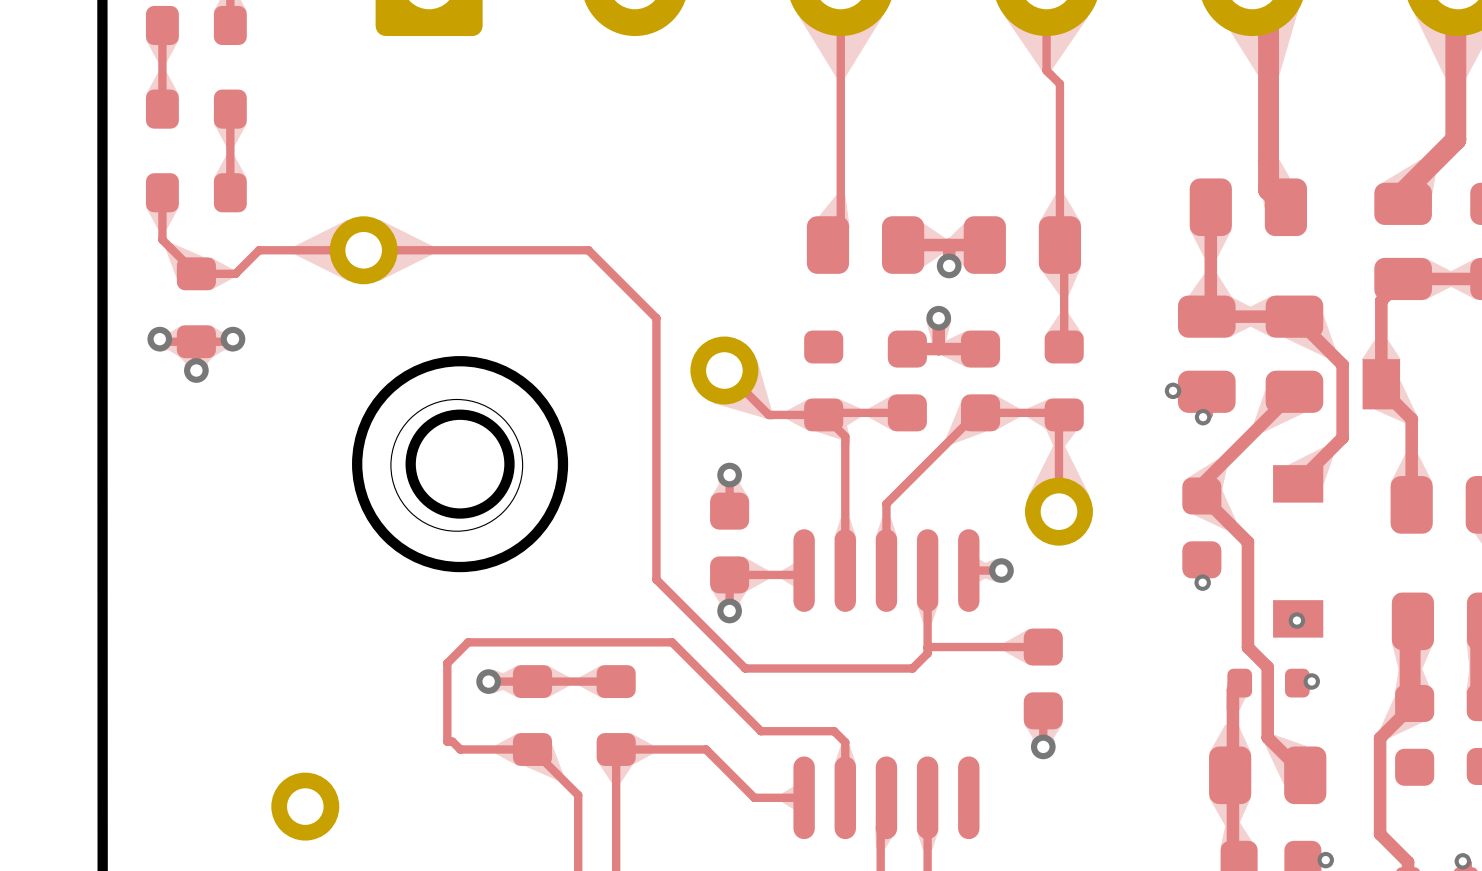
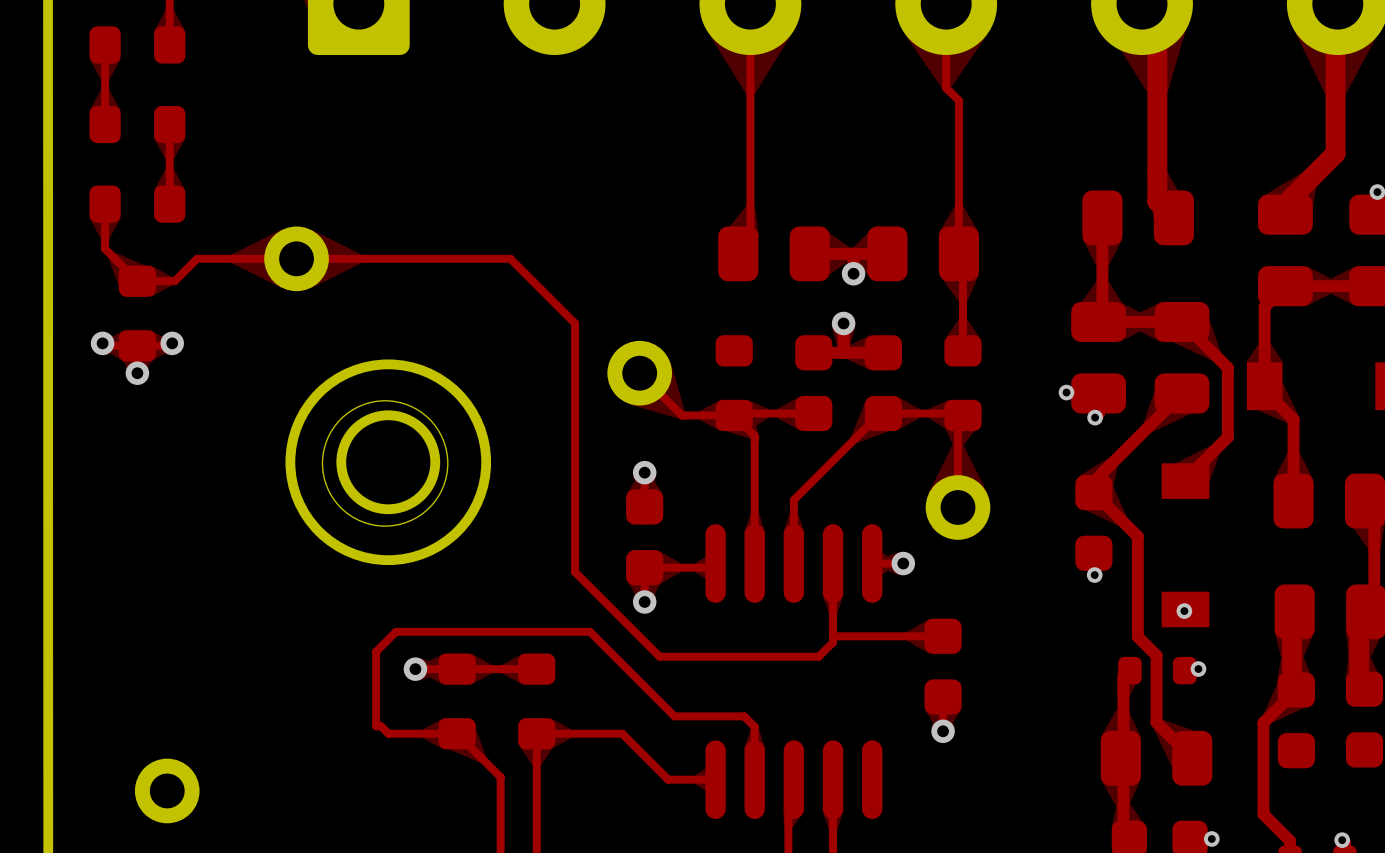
part position: (305, 806) -> (167, 790)

